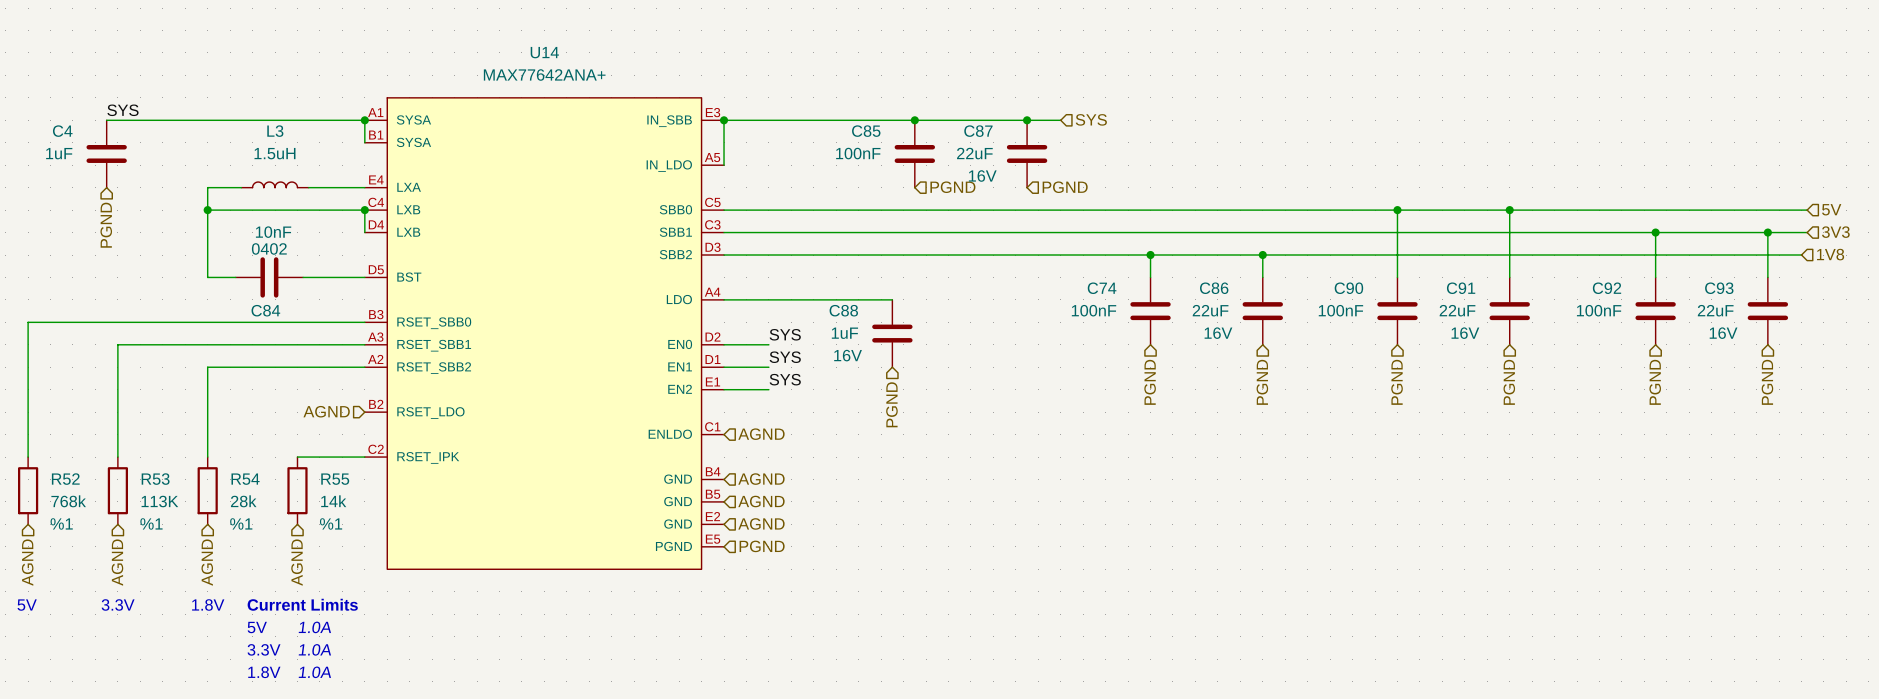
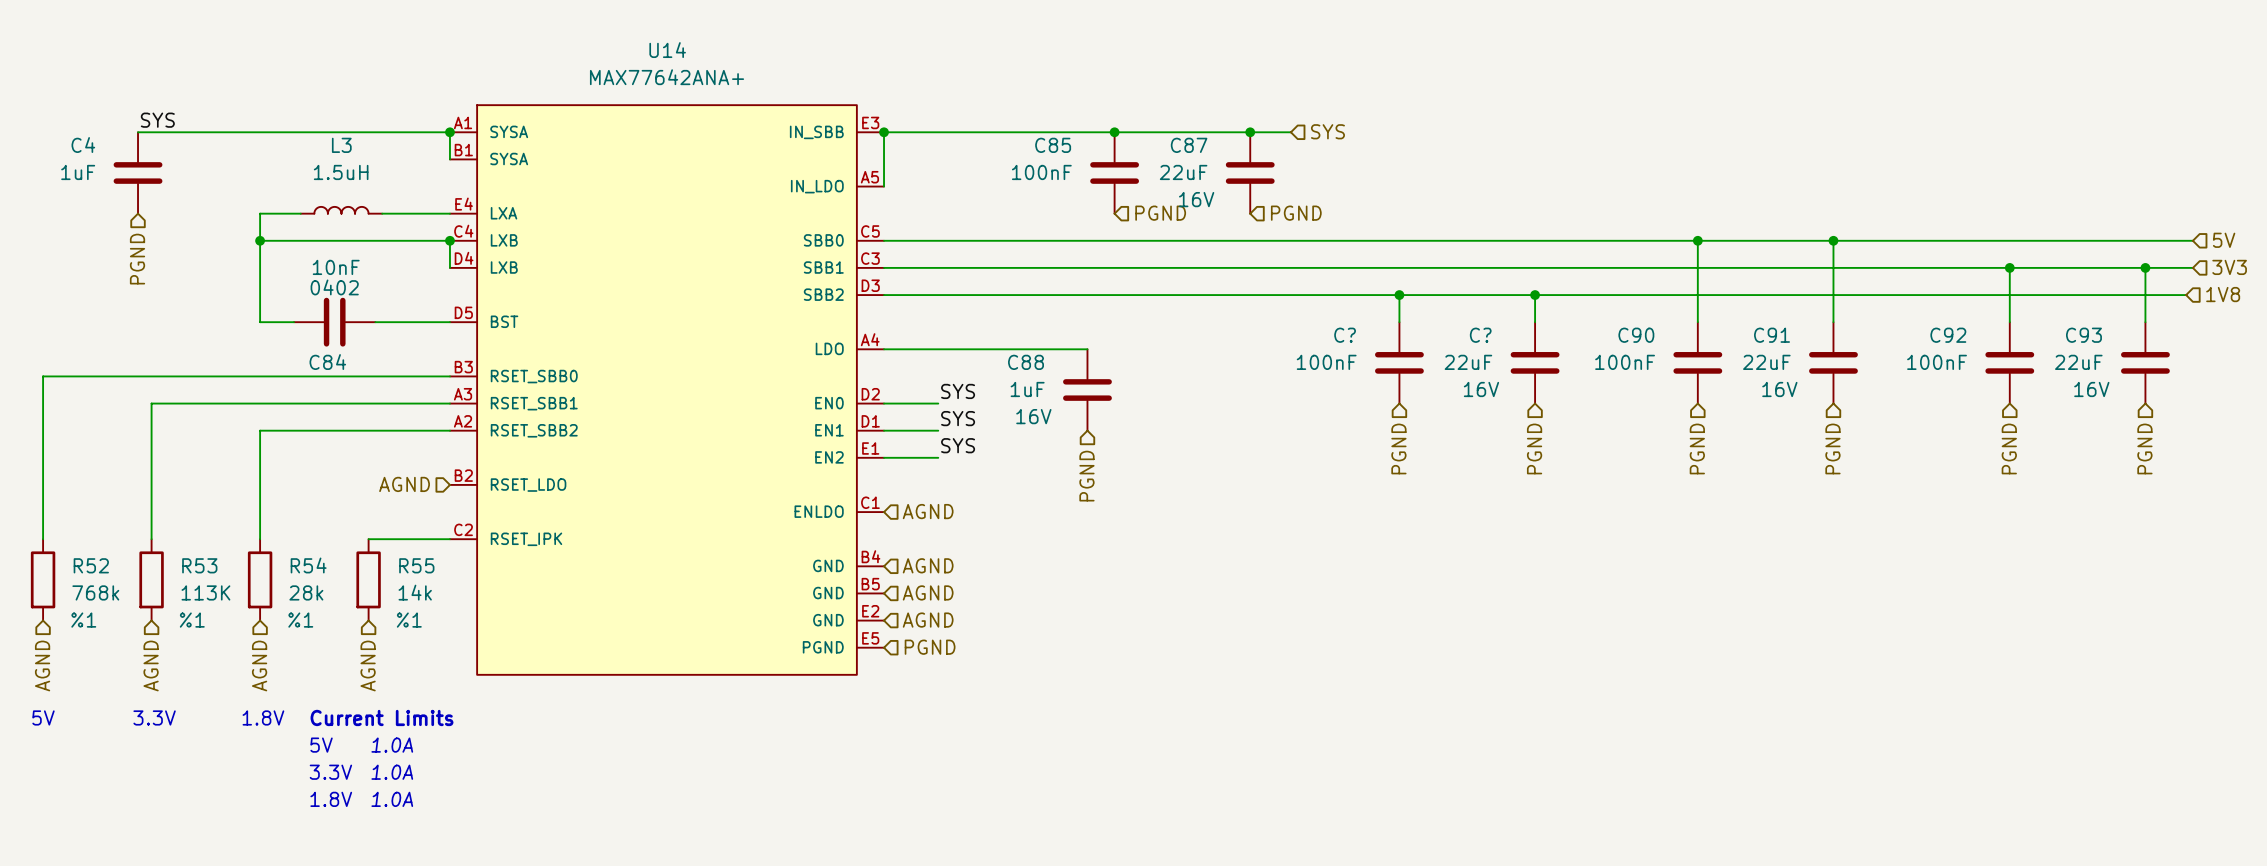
C74 name: C74 (1102, 288) -> C? (1345, 335)
C86 name: C86 (1214, 288) -> C? (1480, 335)

